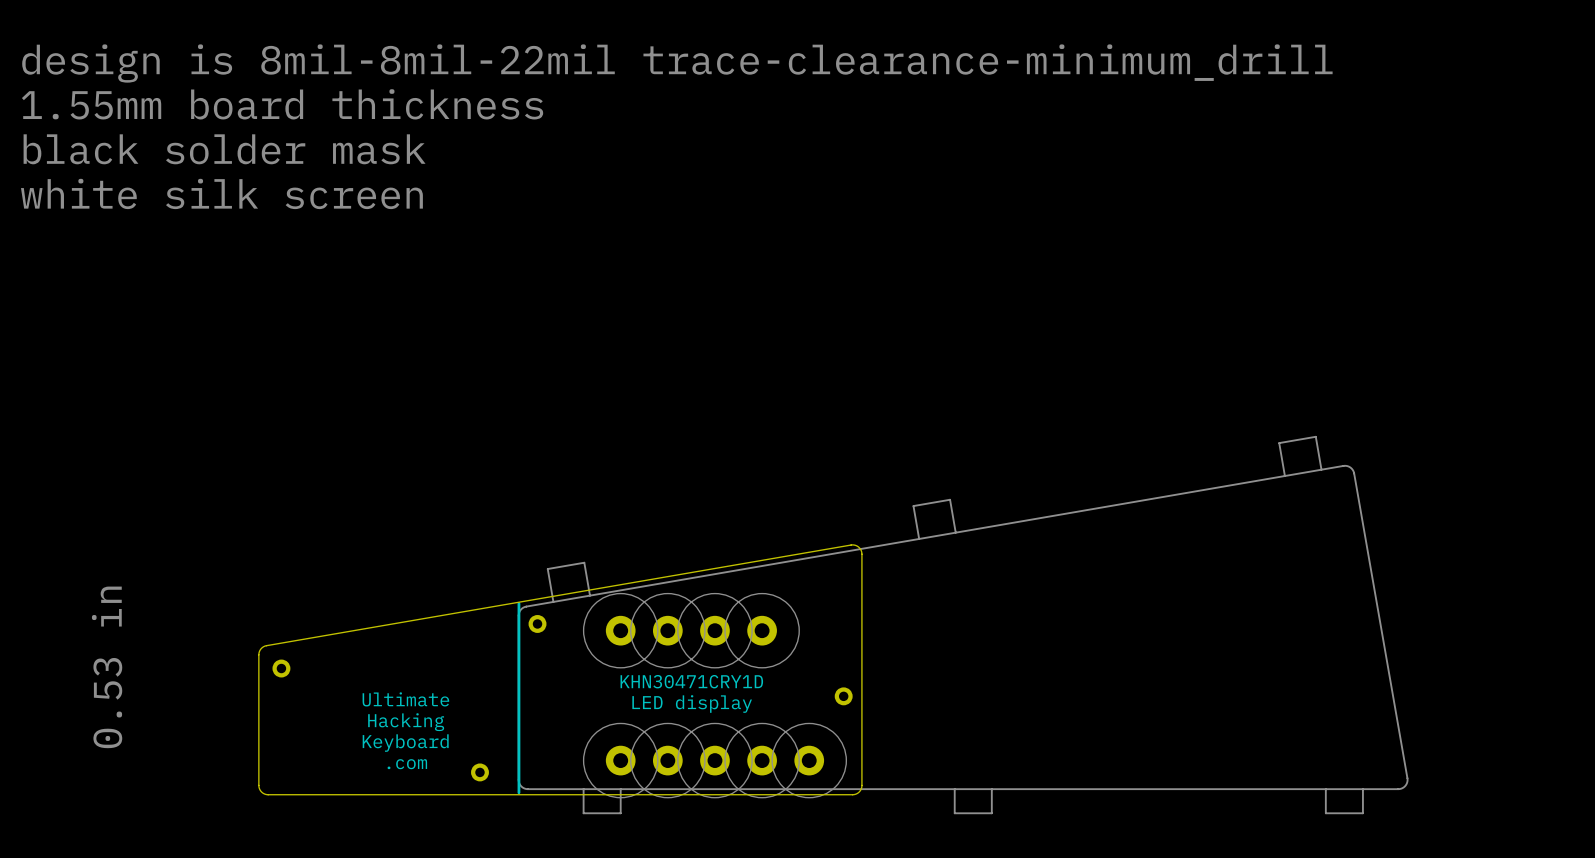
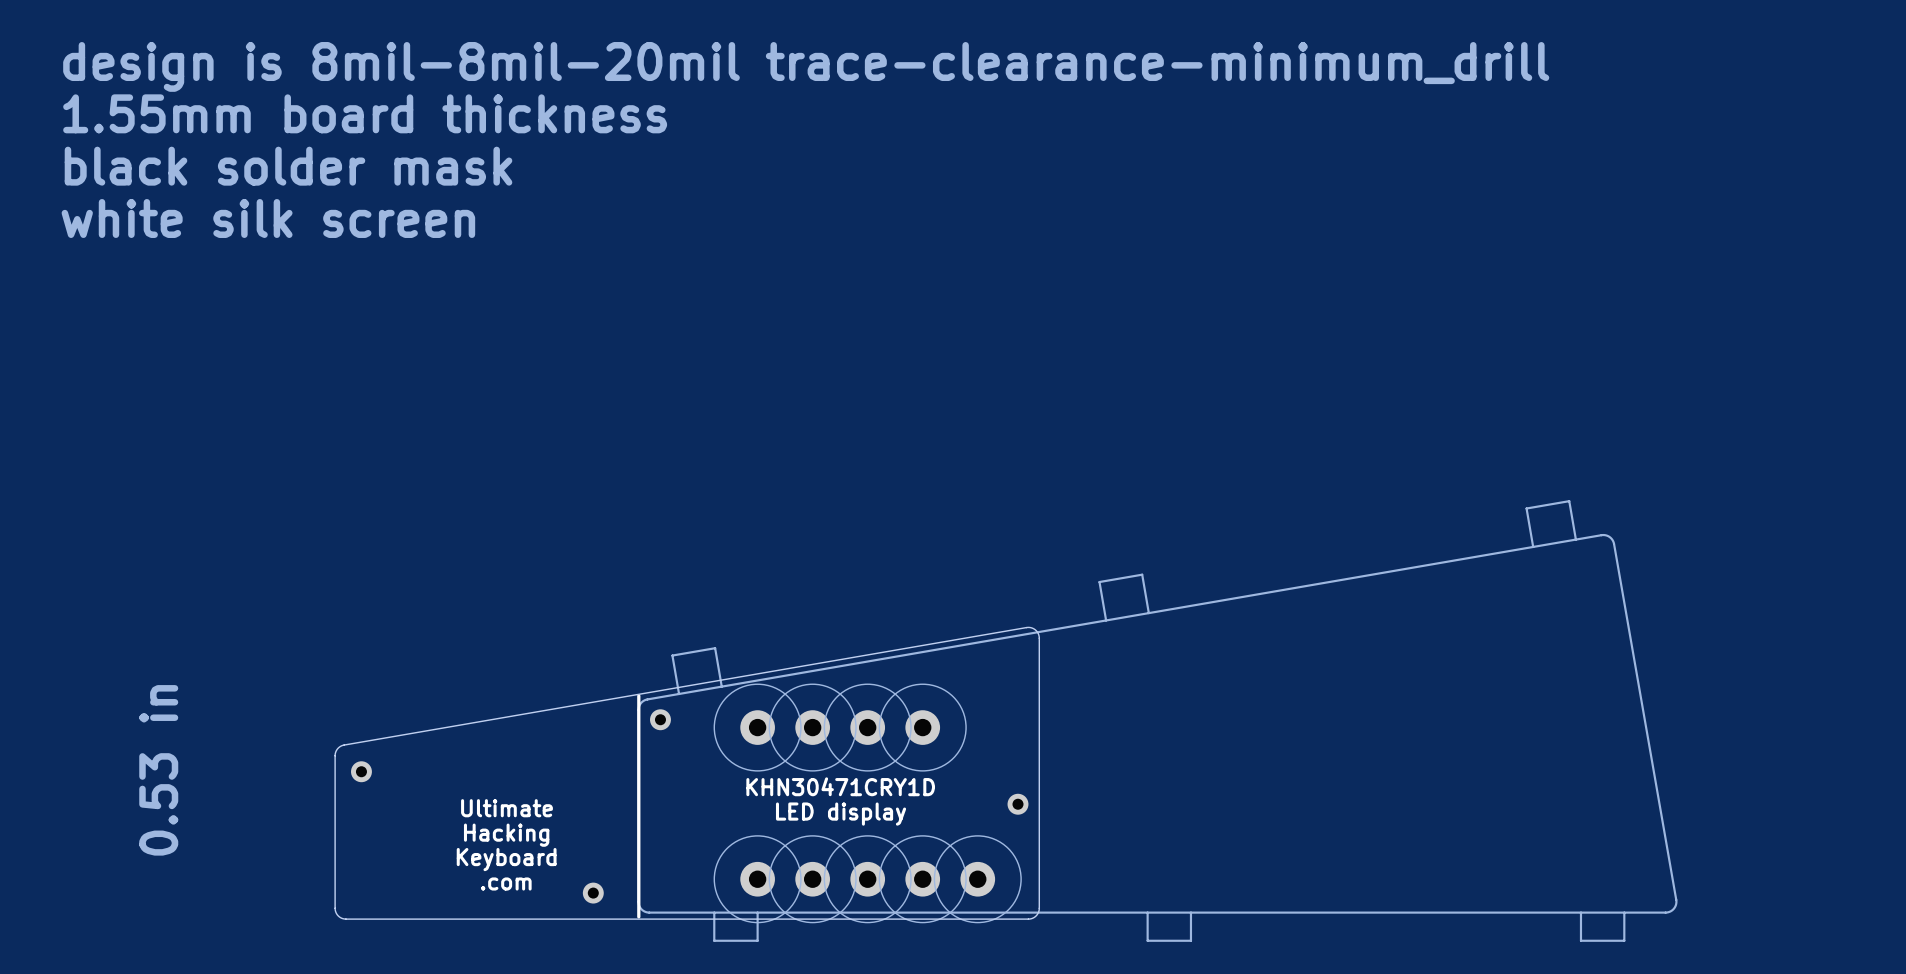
text: design is 8mil-8mil-22mil trace-clearance-minimum_drill (677, 63) -> design is 8mil-8mil-20mil trace-clearance-minimum_drill (806, 66)

